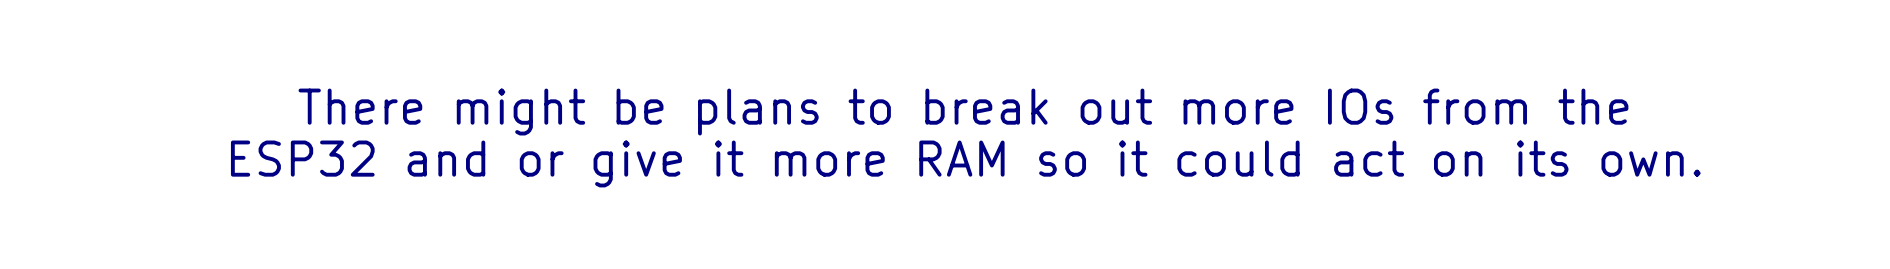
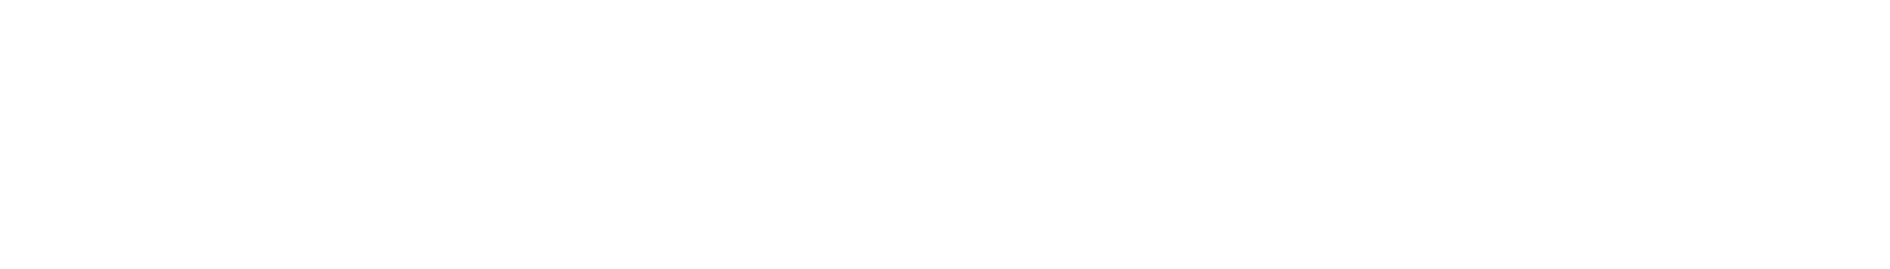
text: There might be plans to break out more IOs from the (963, 112) -> none
text: ESP32 and or give it more RAM so it could act on its own. (965, 163) -> none

